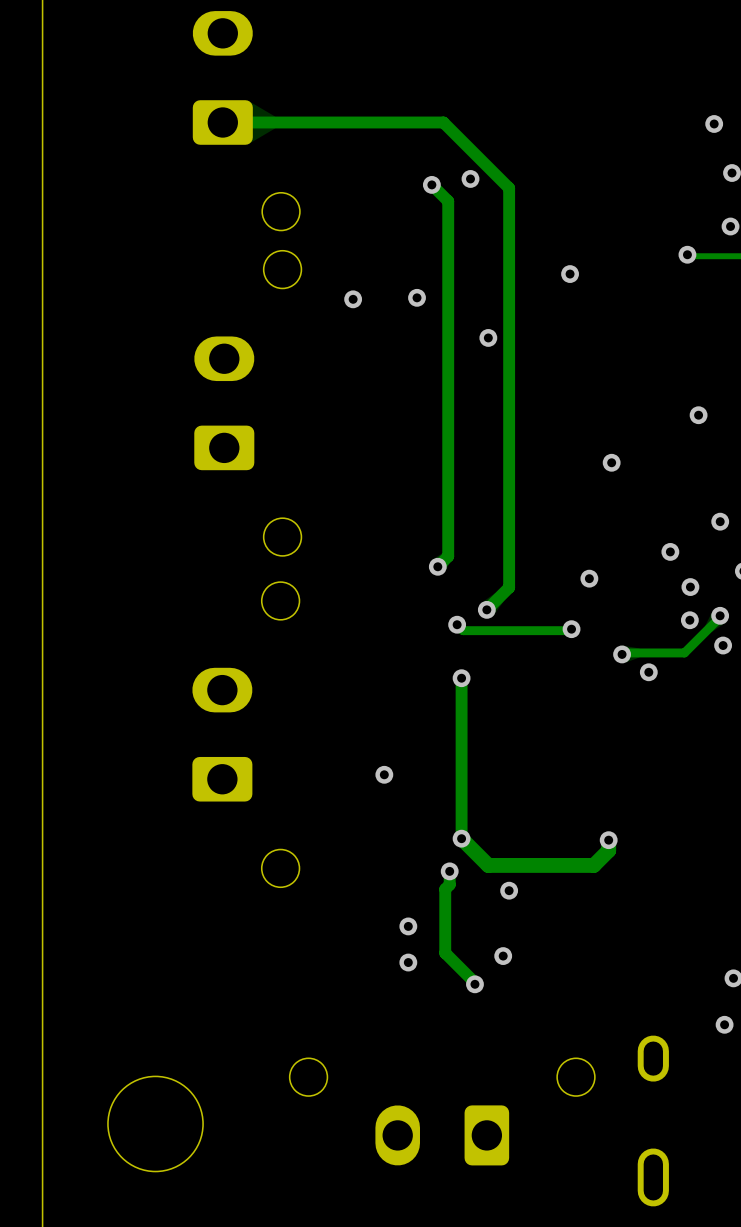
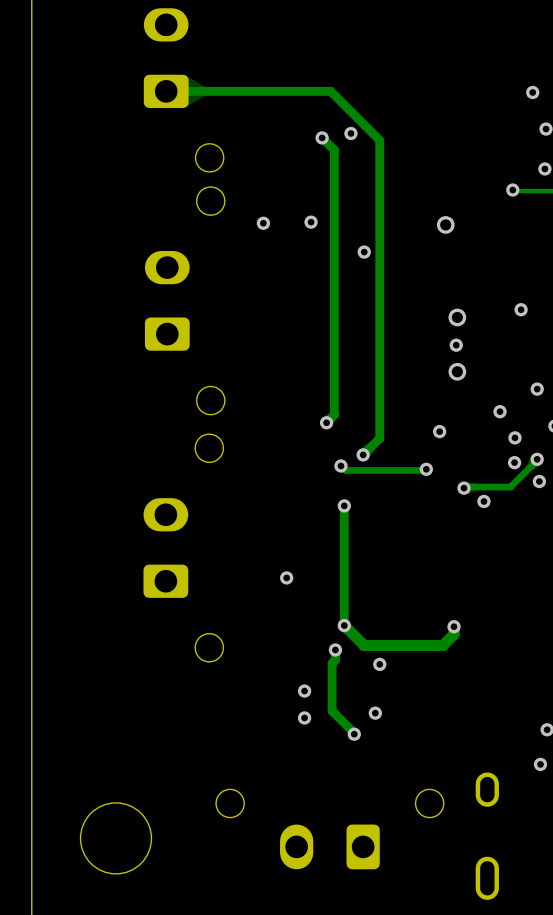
via: (570, 274) -> none
via: none -> (445, 224)
via: none -> (457, 317)
via: none -> (457, 371)

